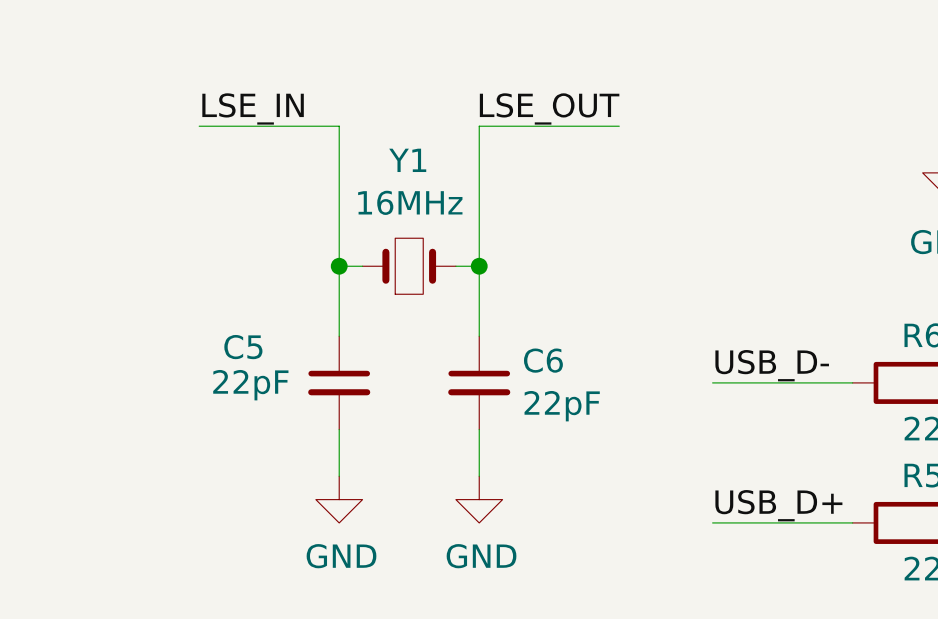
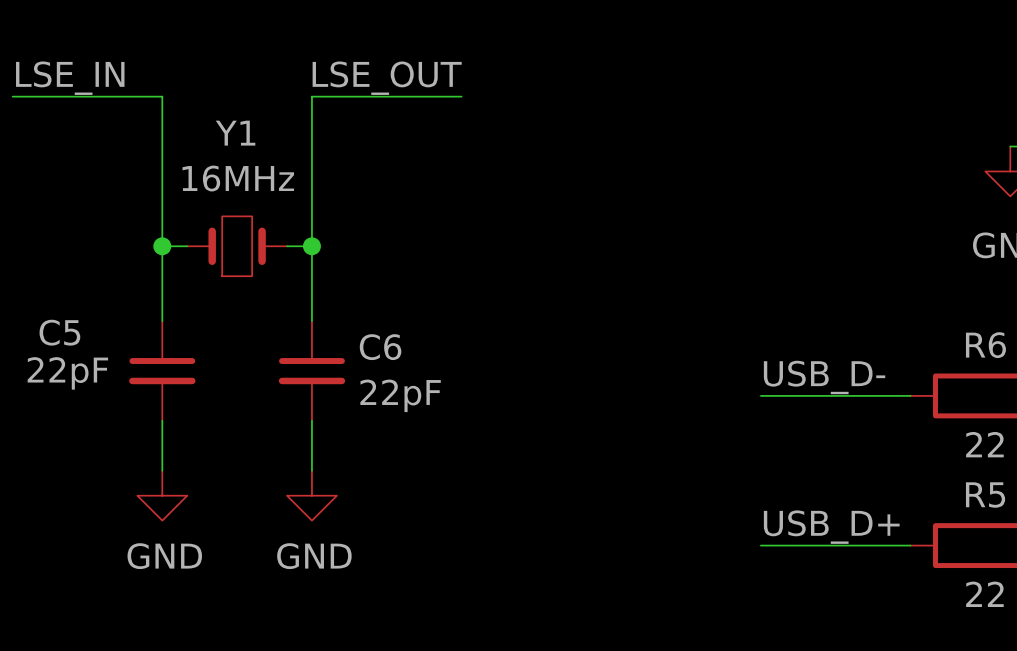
label position: LSE_IN (253, 108) -> LSE_IN (70, 78)
label position: LSE_OUT (549, 108) -> LSE_OUT (387, 78)
wire: (199, 126) (339, 126) (339, 336) -> (12, 96) (162, 96) (162, 321)
wire: (619, 126) (479, 126) (479, 336) -> (461, 96) (311, 96) (311, 321)
junction: none -> (162, 246)
wire: (339, 266) (362, 266) -> (162, 246) (187, 246)
junction position: (339, 266) -> (311, 246)
Y1 position: (409, 266) -> (237, 246)
wire: (455, 266) (479, 266) -> (287, 246) (311, 246)
junction: (479, 266) -> none
C5 position: (339, 382) -> (162, 370)
C6 position: (479, 382) -> (311, 370)
wire: (339, 429) (339, 476) -> (162, 420) (162, 470)
wire: (479, 429) (479, 476) -> (311, 420) (311, 470)
power symbol: none -> GND (162, 495)
power symbol position: GND (339, 499) -> GND (311, 495)
power symbol: GND (479, 499) -> none

